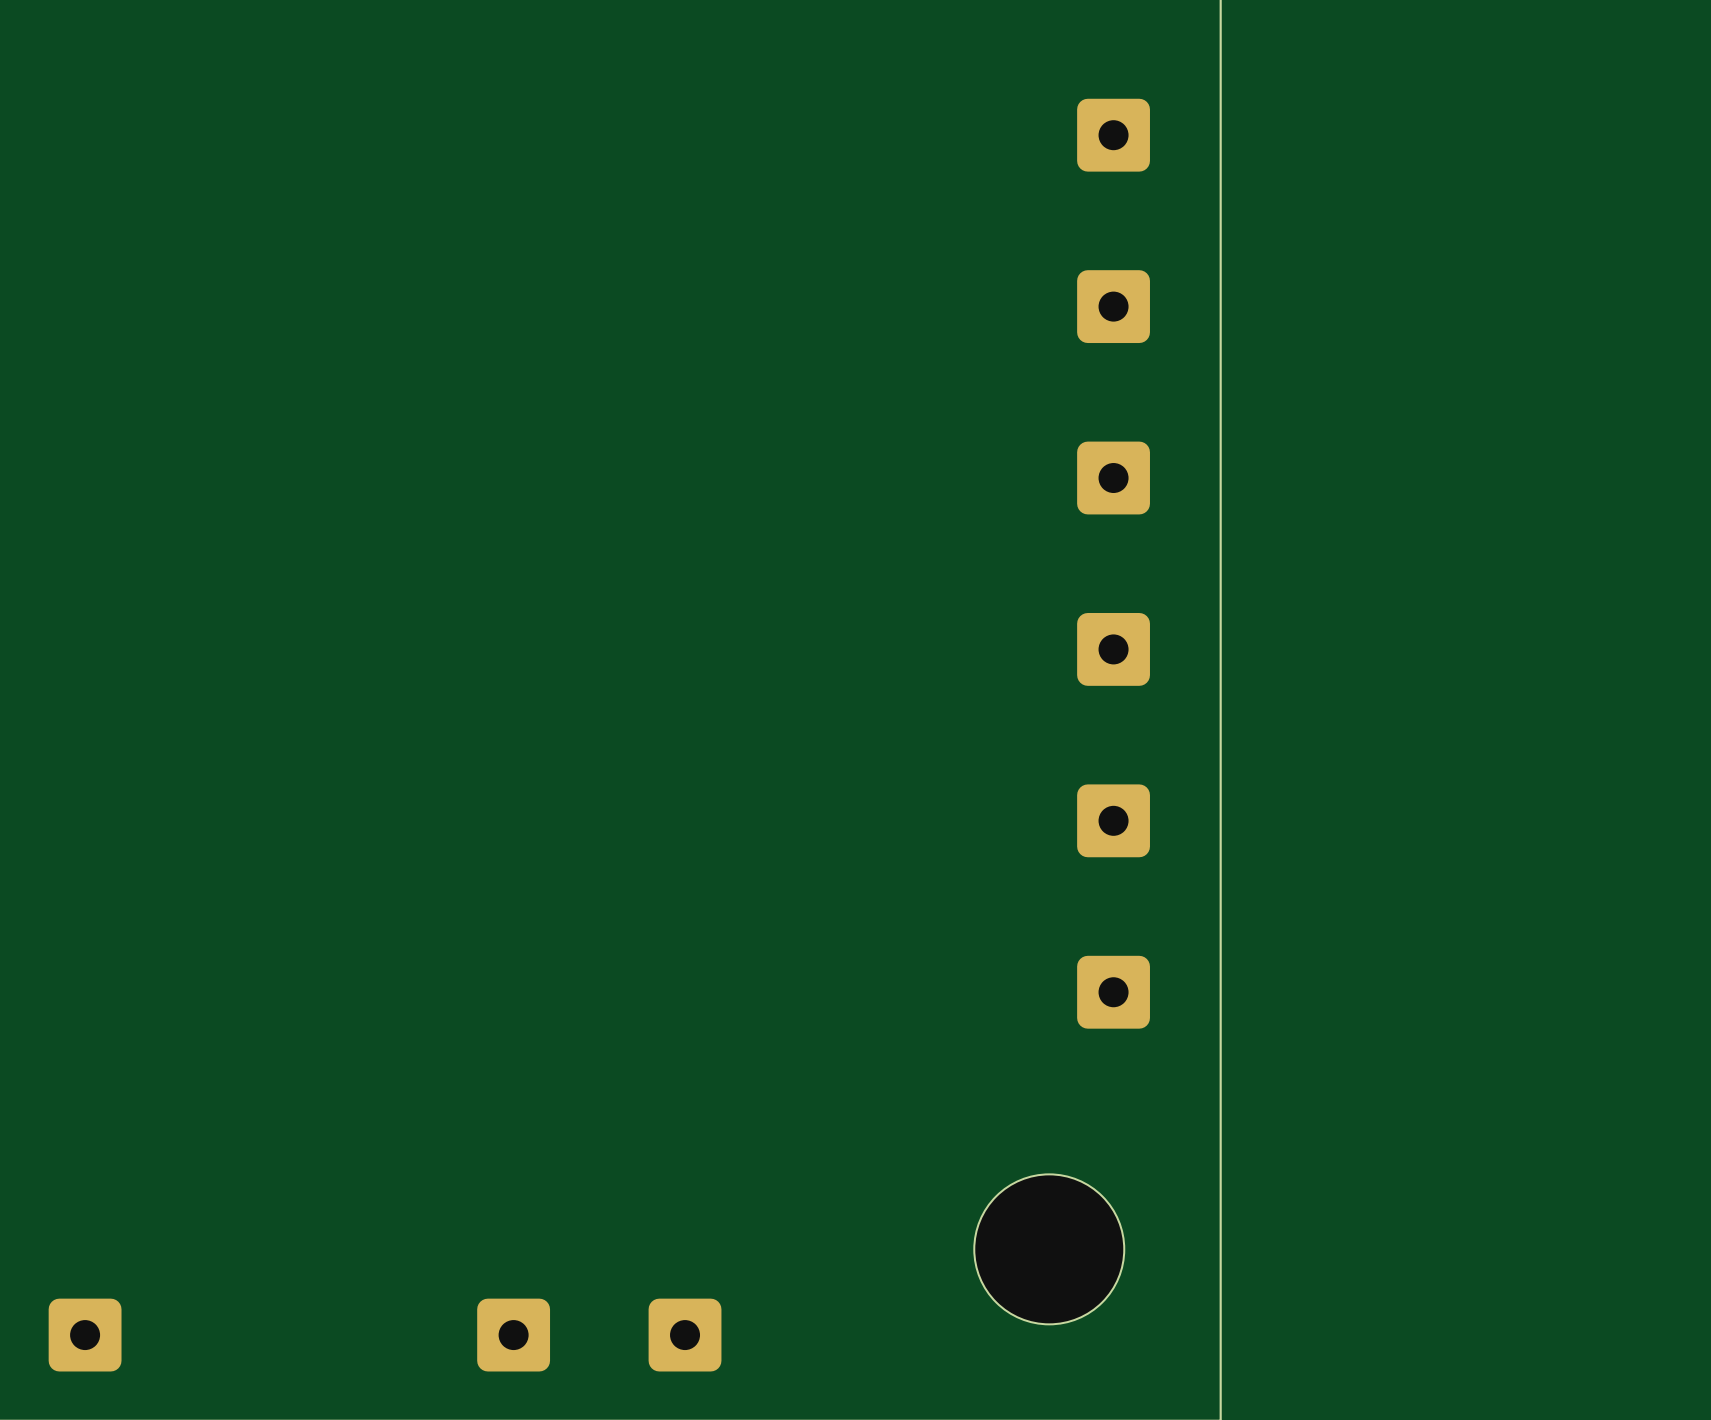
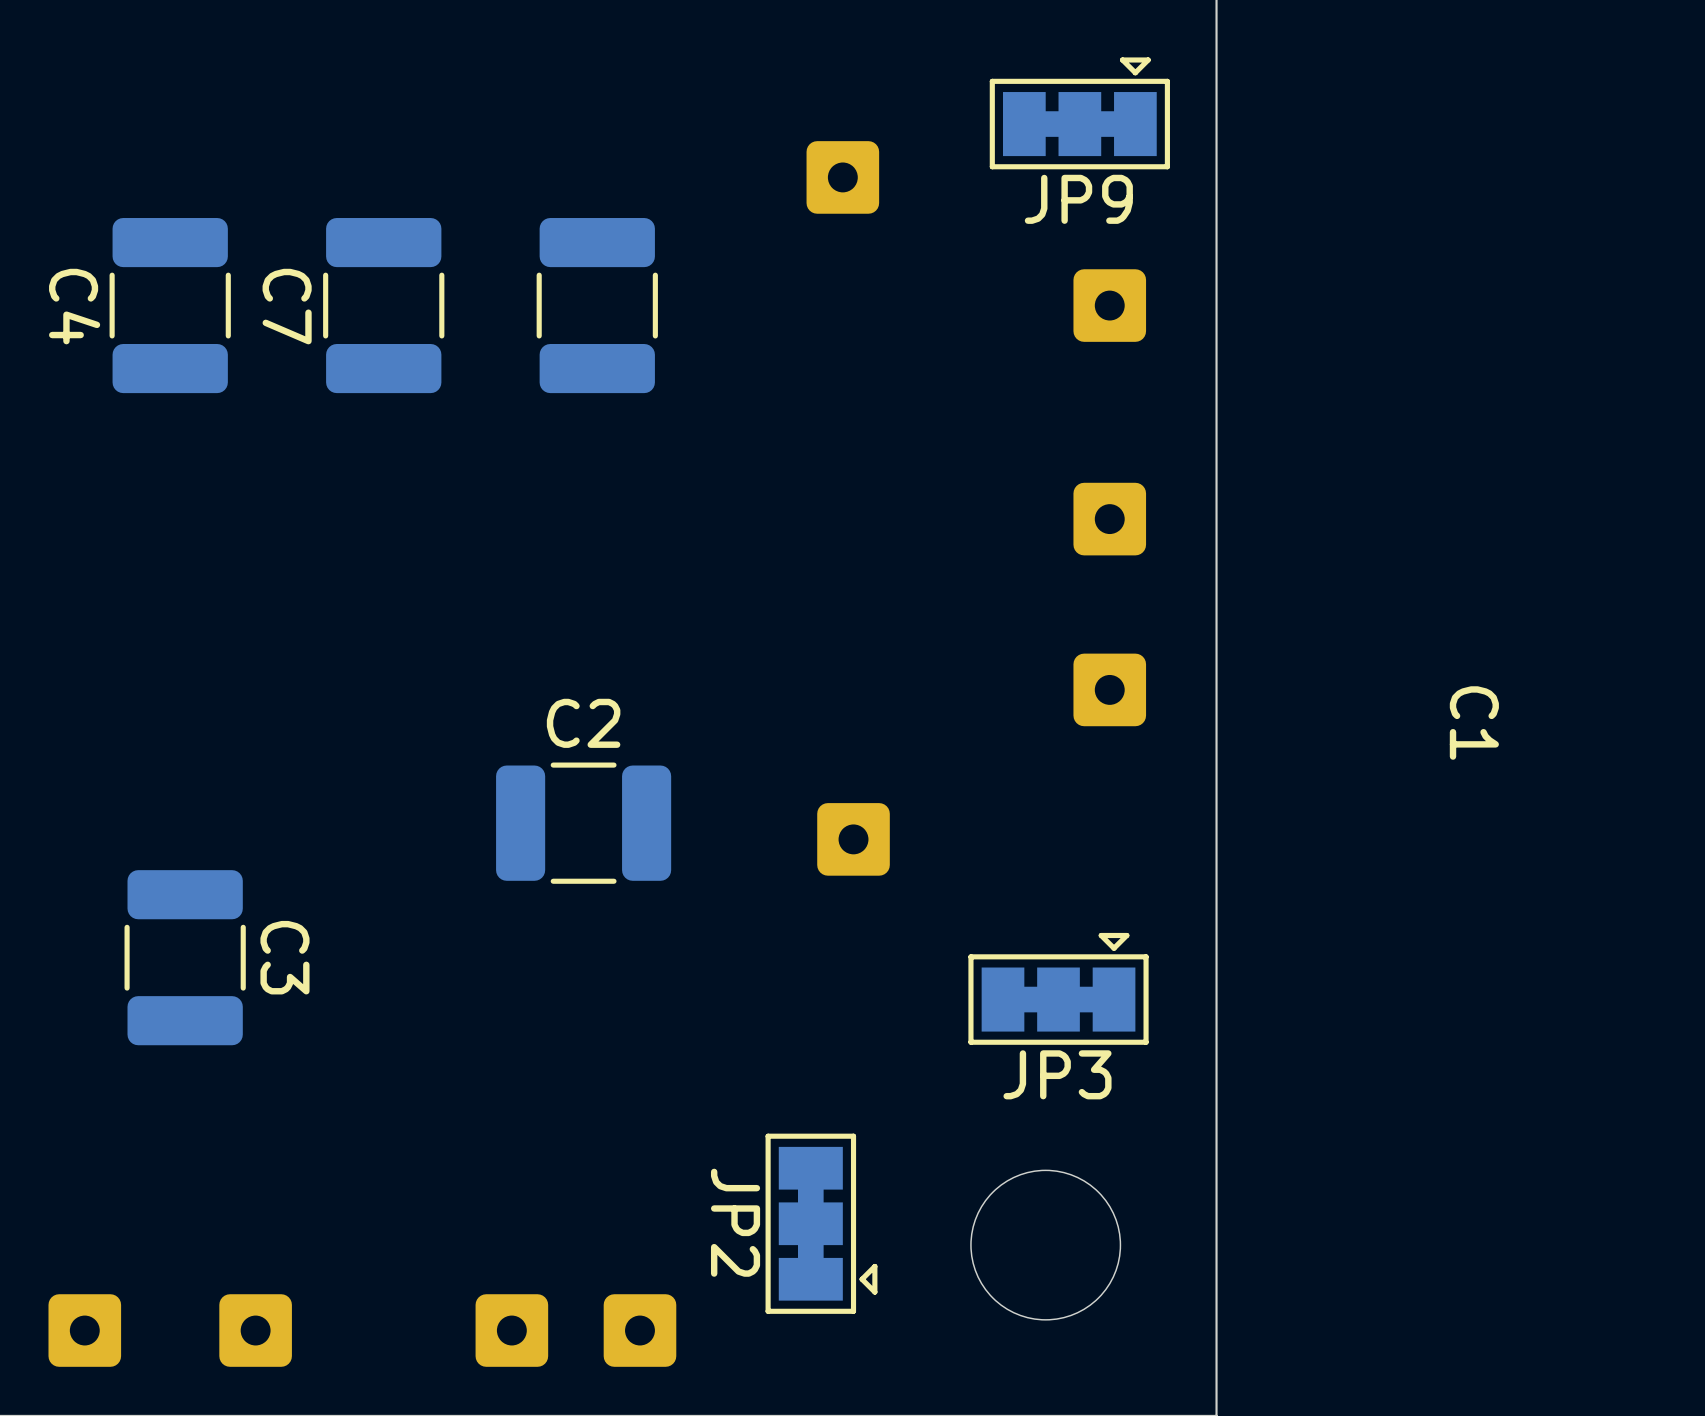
JP9: none -> (1079, 113)
part position: (1113, 135) -> (842, 177)
C4: none -> (170, 305)
C7: none -> (383, 305)
C1: none -> (597, 305)
part position: (1113, 478) -> (1109, 519)
part position: (1113, 649) -> (1109, 689)
part: (1113, 820) -> none
C2: none -> (583, 823)
part: none -> (853, 839)
C3: none -> (185, 957)
JP3: none -> (1058, 988)
part: (1113, 992) -> none
JP2: none -> (821, 1223)
part: none -> (255, 1330)
part position: (685, 1335) -> (639, 1330)

